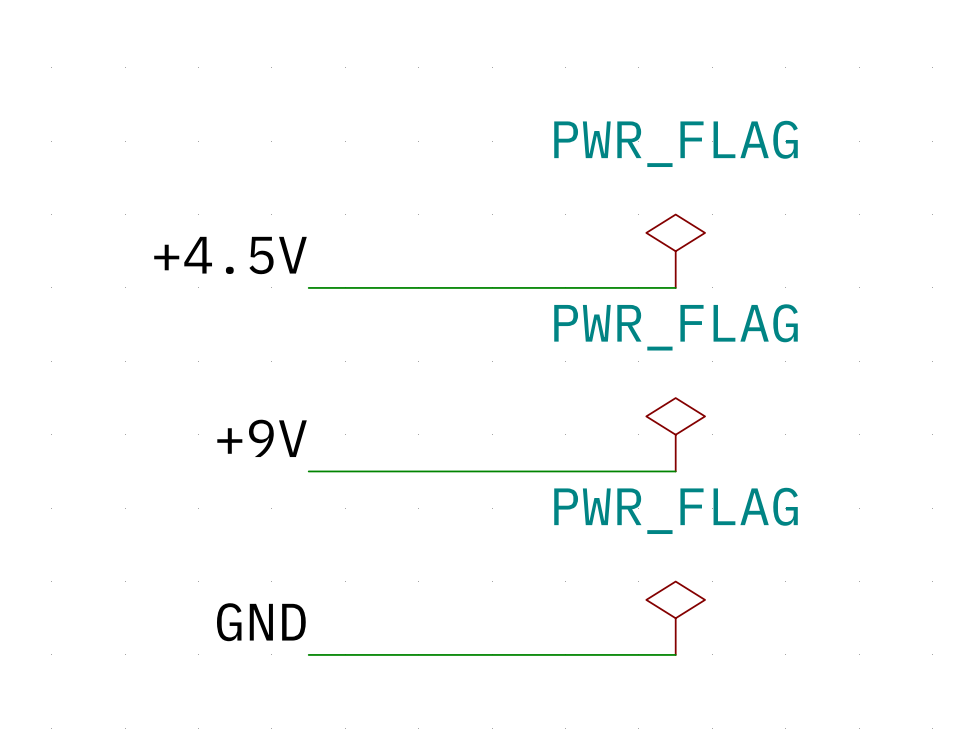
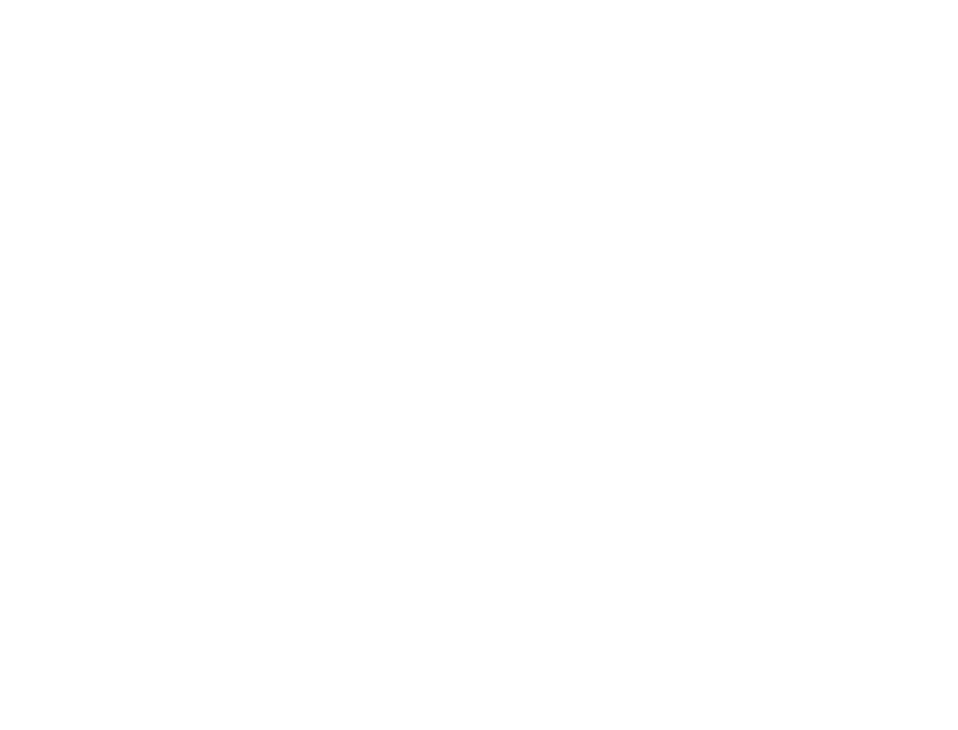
power symbol: PWR_FLAG (675, 251) -> none
label: +4.5V (230, 255) -> none
wire: (308, 287) (675, 287) -> none
power symbol: PWR_FLAG (675, 434) -> none
label: +9V (262, 438) -> none
wire: (308, 471) (675, 471) -> none
power symbol: PWR_FLAG (675, 618) -> none
label: GND (261, 622) -> none
wire: (308, 654) (675, 654) -> none

